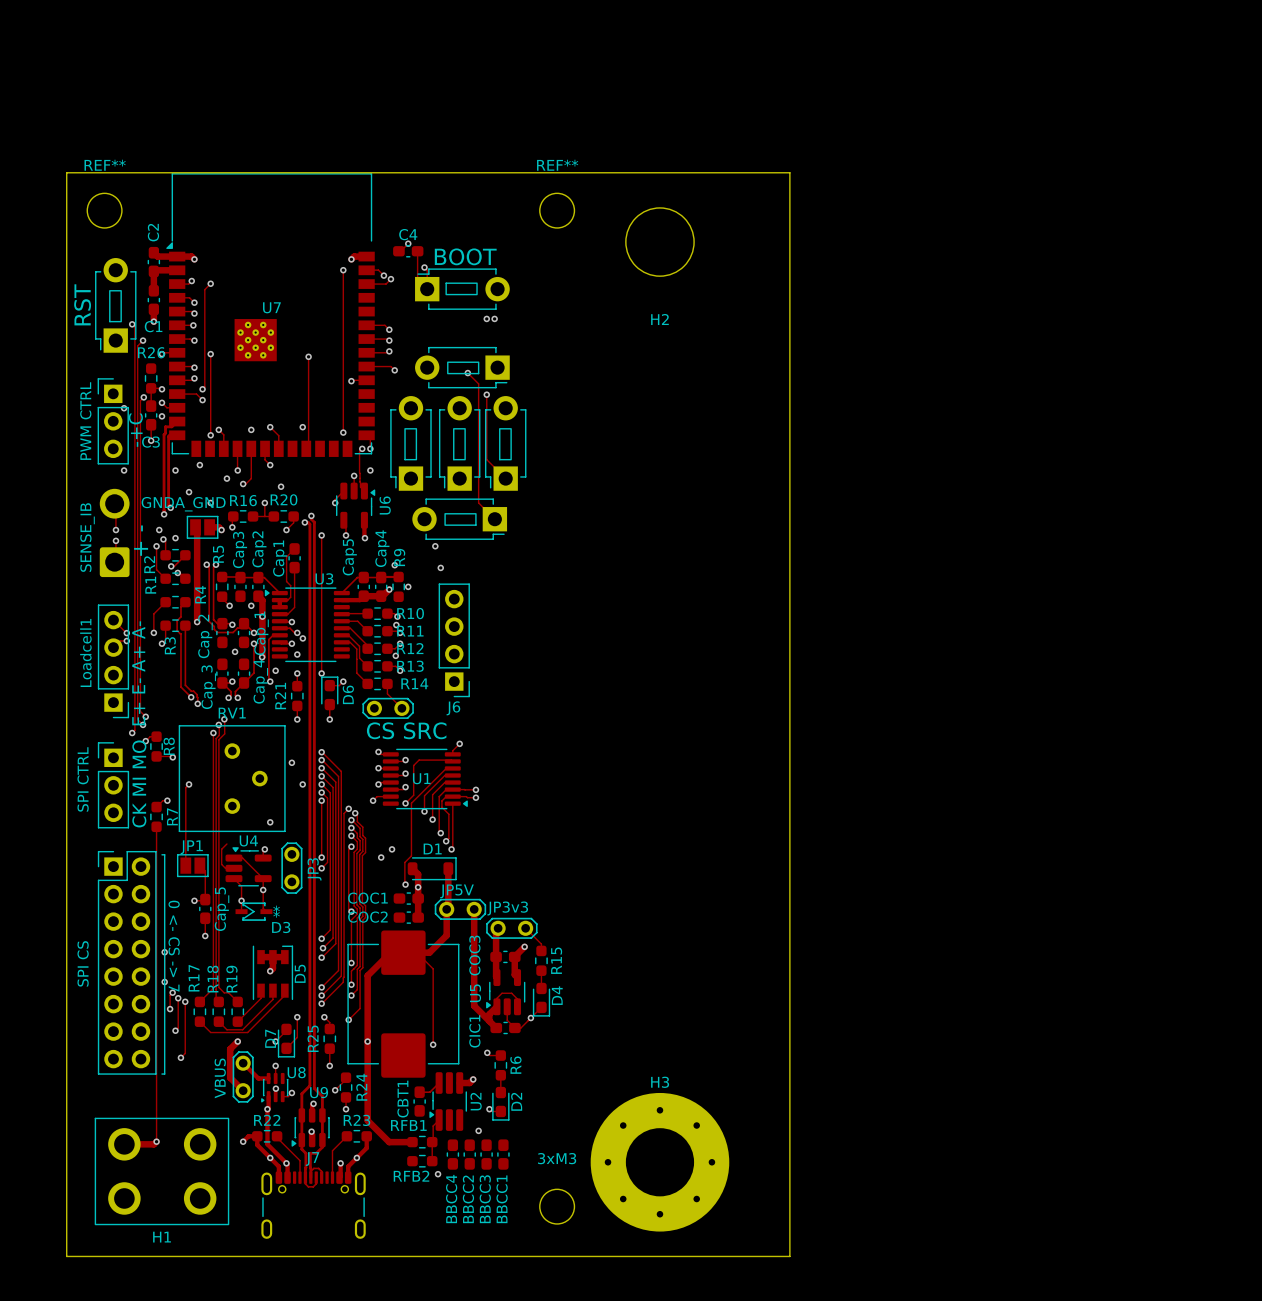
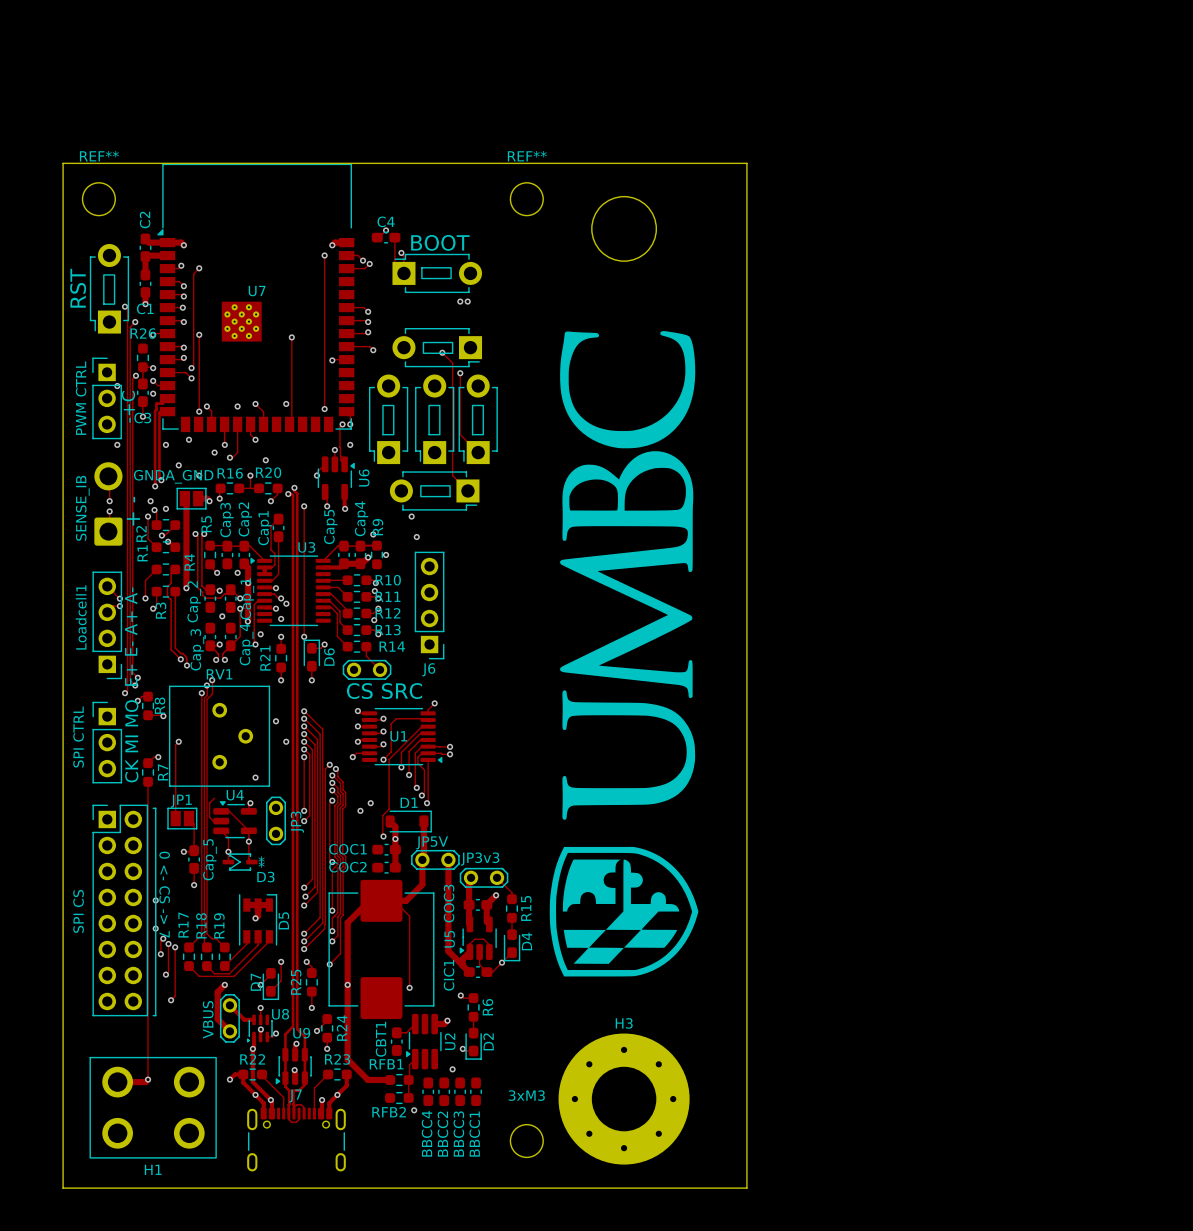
H2 name: H2 (659, 319) -> none
drawing: none -> [549, 331, 699, 977]

